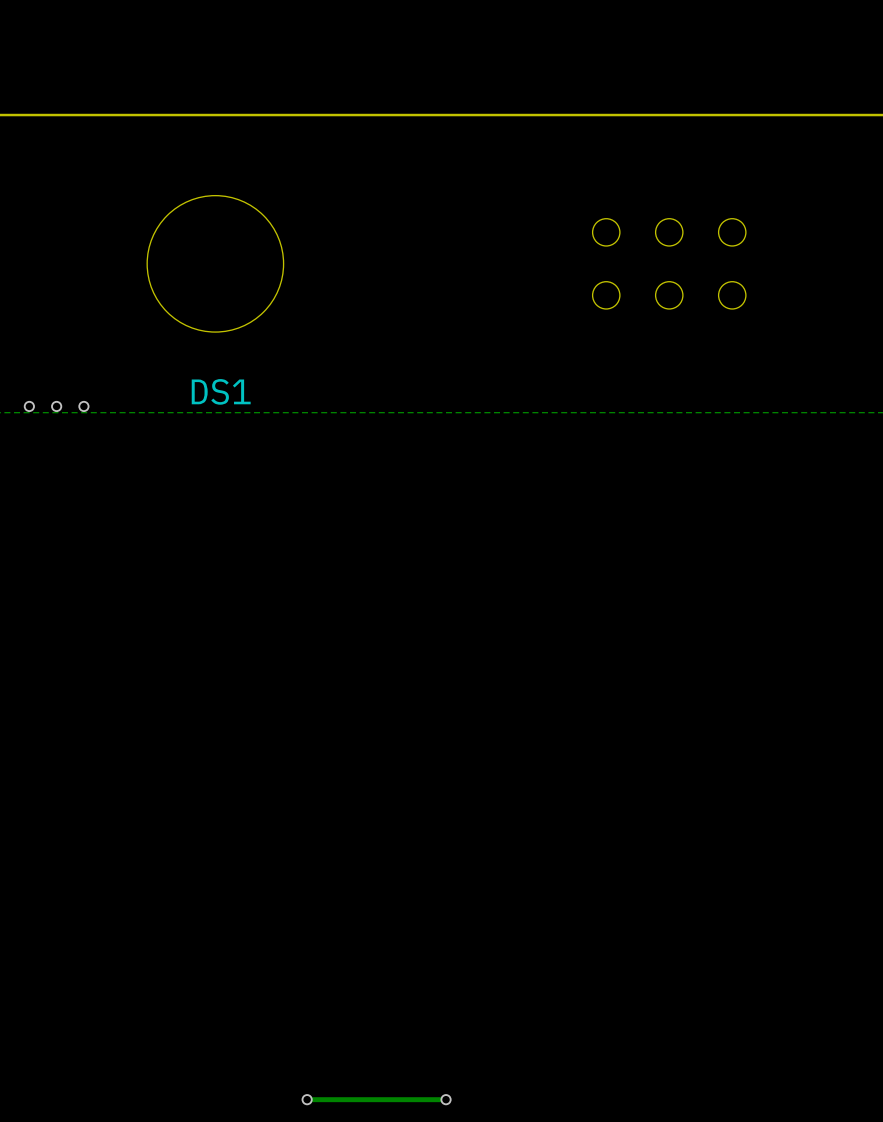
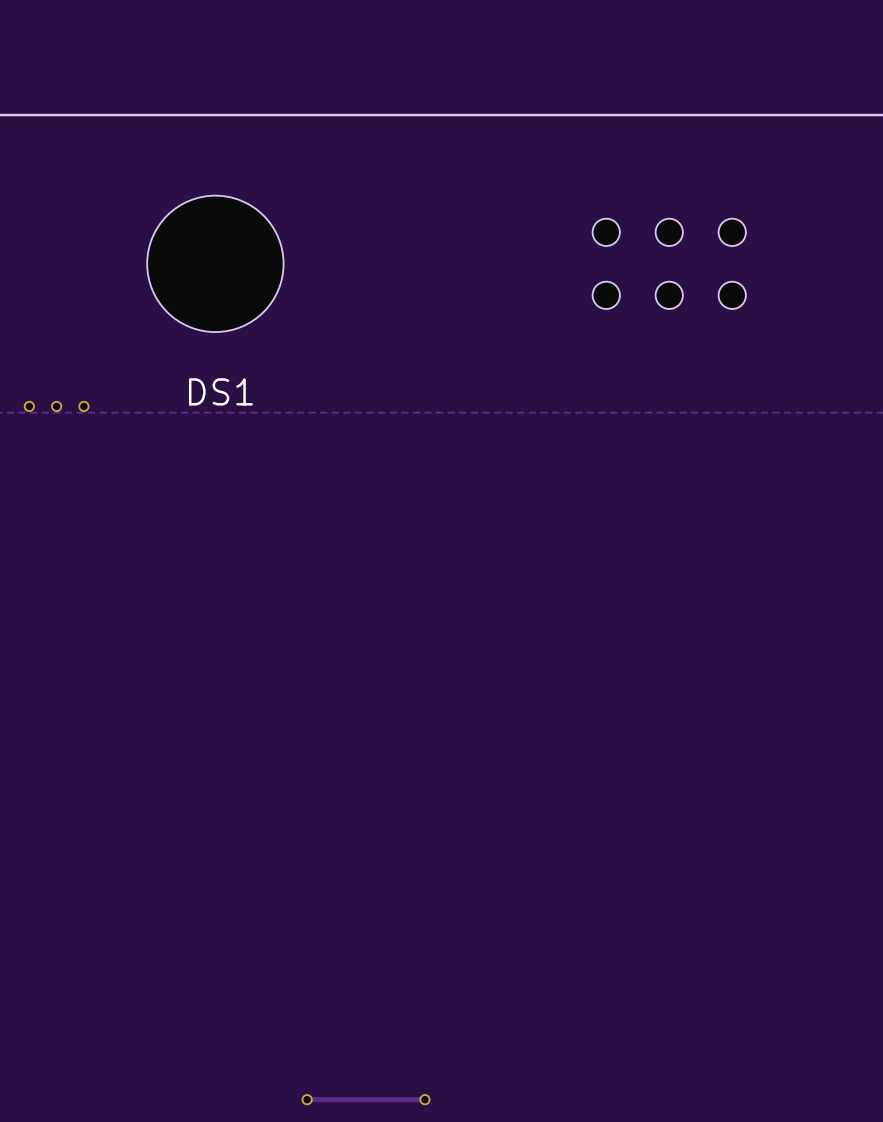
via: none -> (424, 1099)
track: (446, 1099) (424, 1099) -> none
via: (446, 1099) -> none

